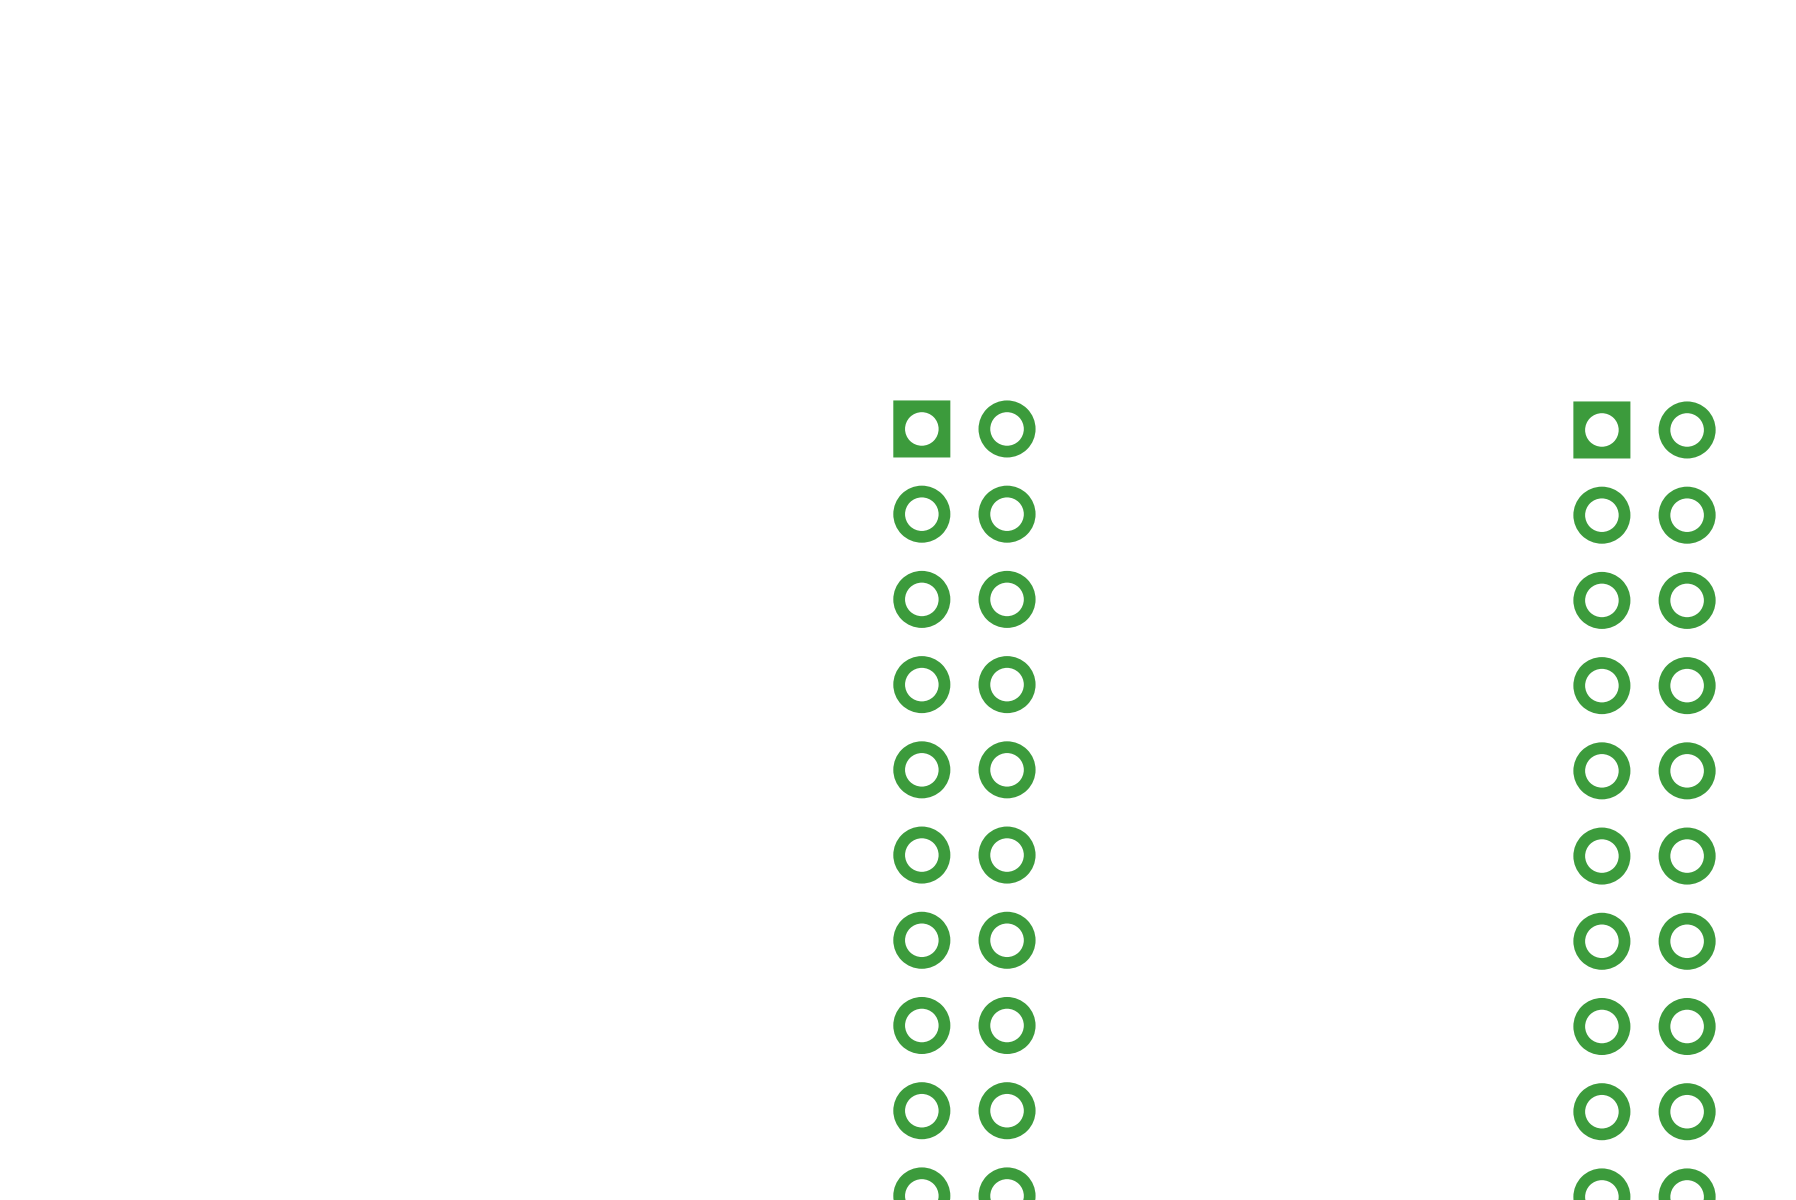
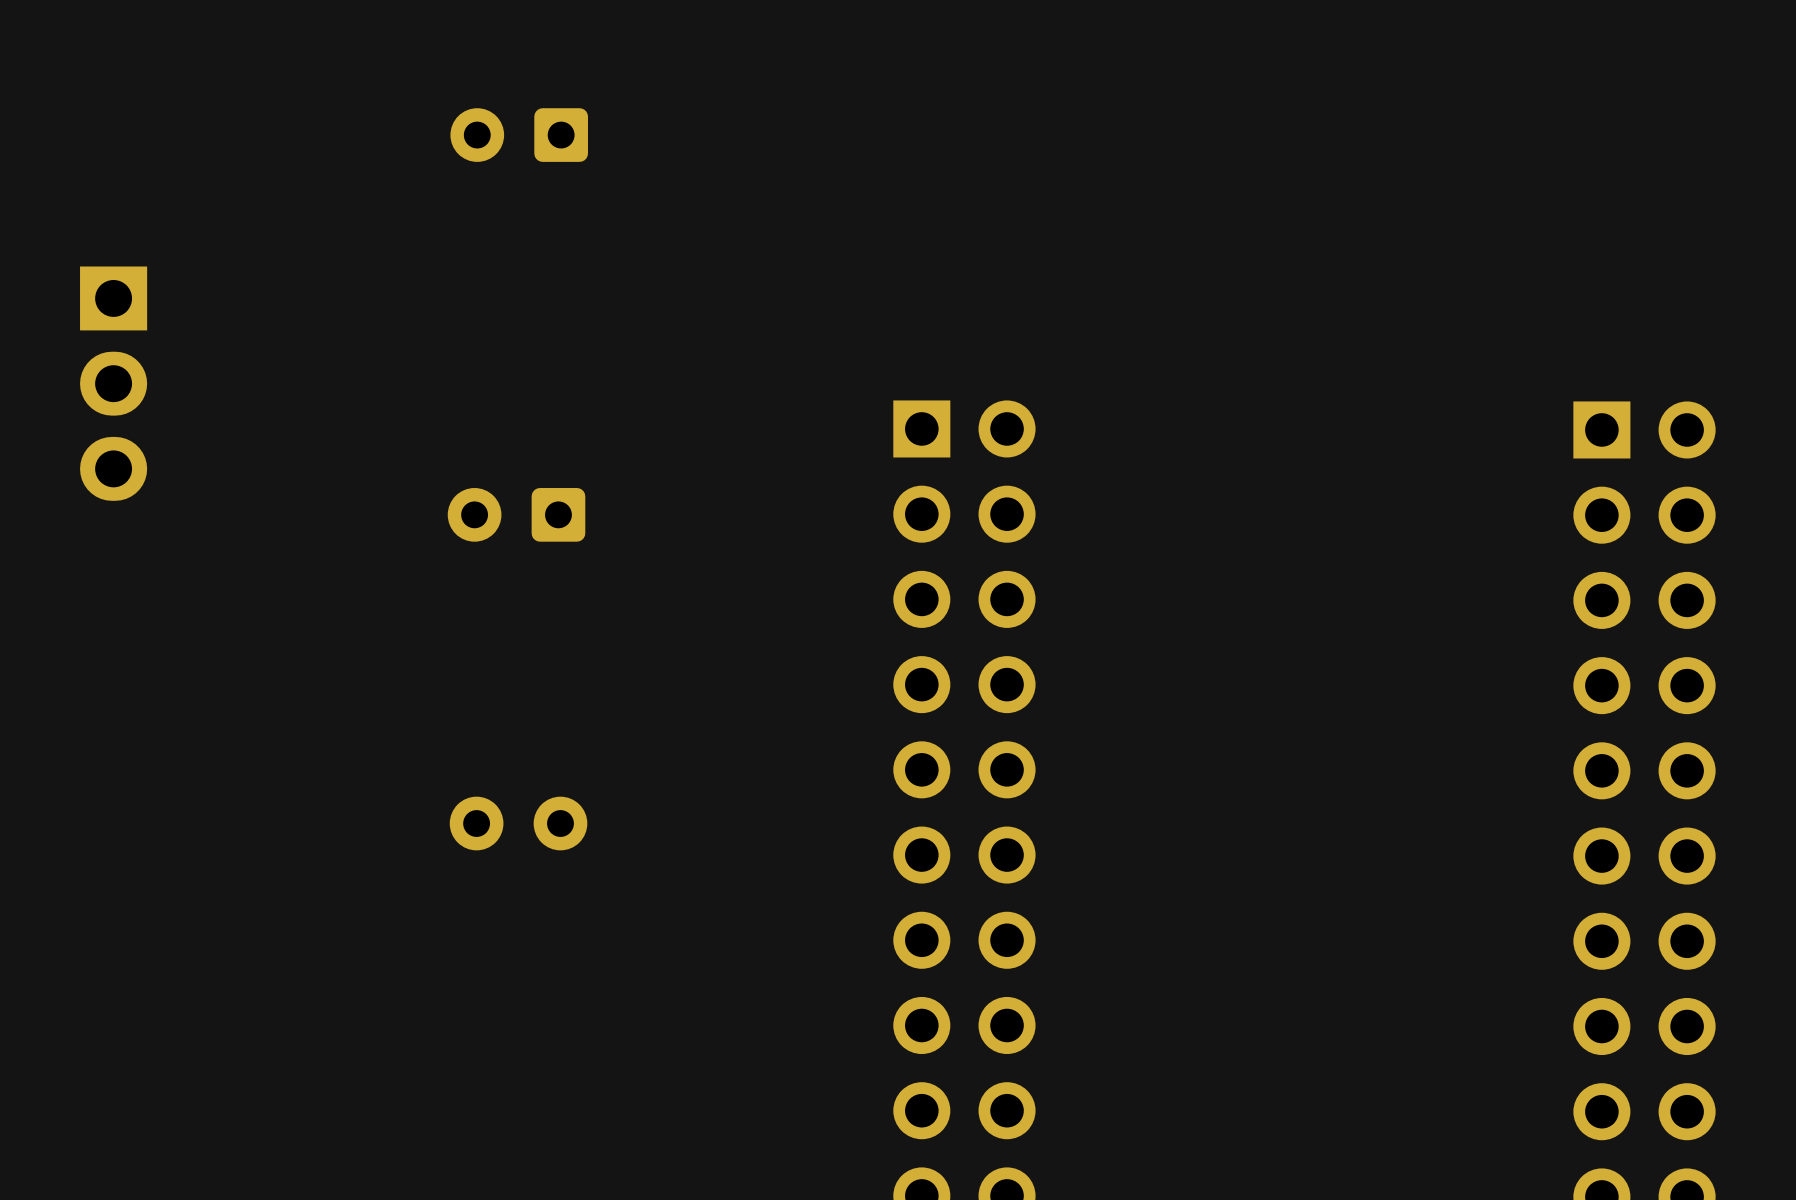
part: none -> (519, 135)
part: none -> (113, 383)
part: none -> (516, 514)
part: none -> (518, 823)

